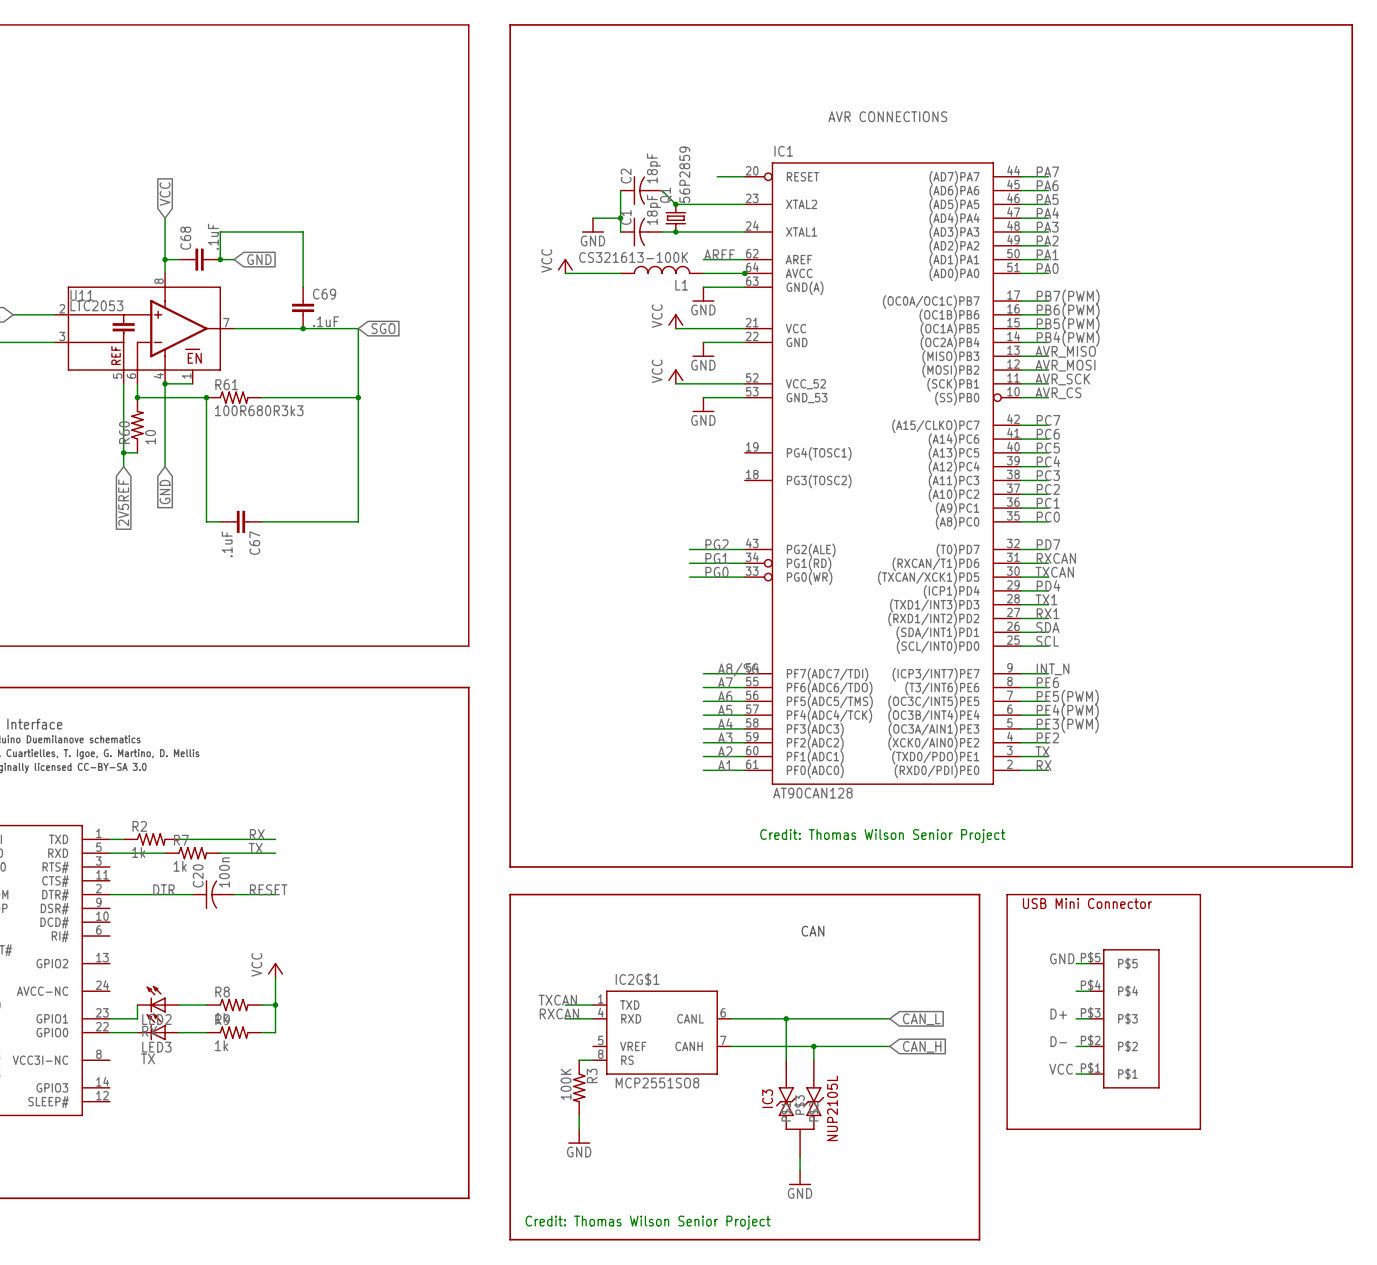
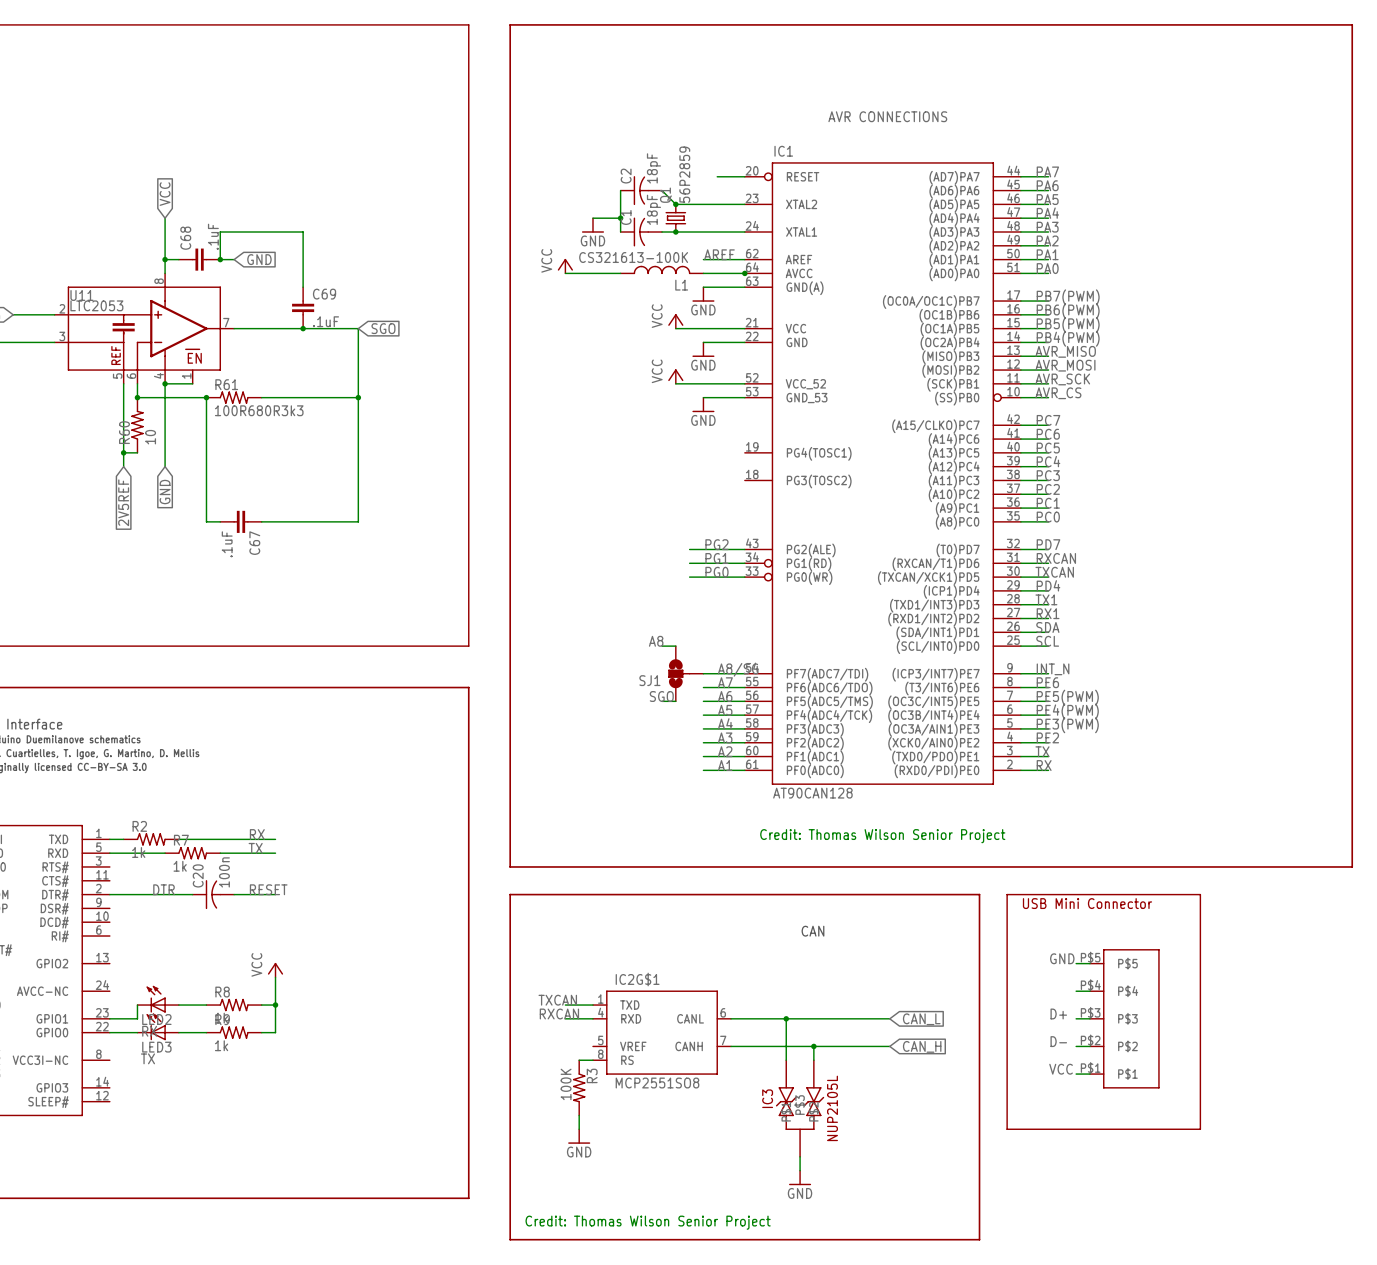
label: none -> A8 (656, 641)
wire: none -> (662, 646) (675, 646)
SJ1: none -> (685, 673)
label: none -> SGO (661, 696)
wire: none -> (662, 701) (675, 701)

